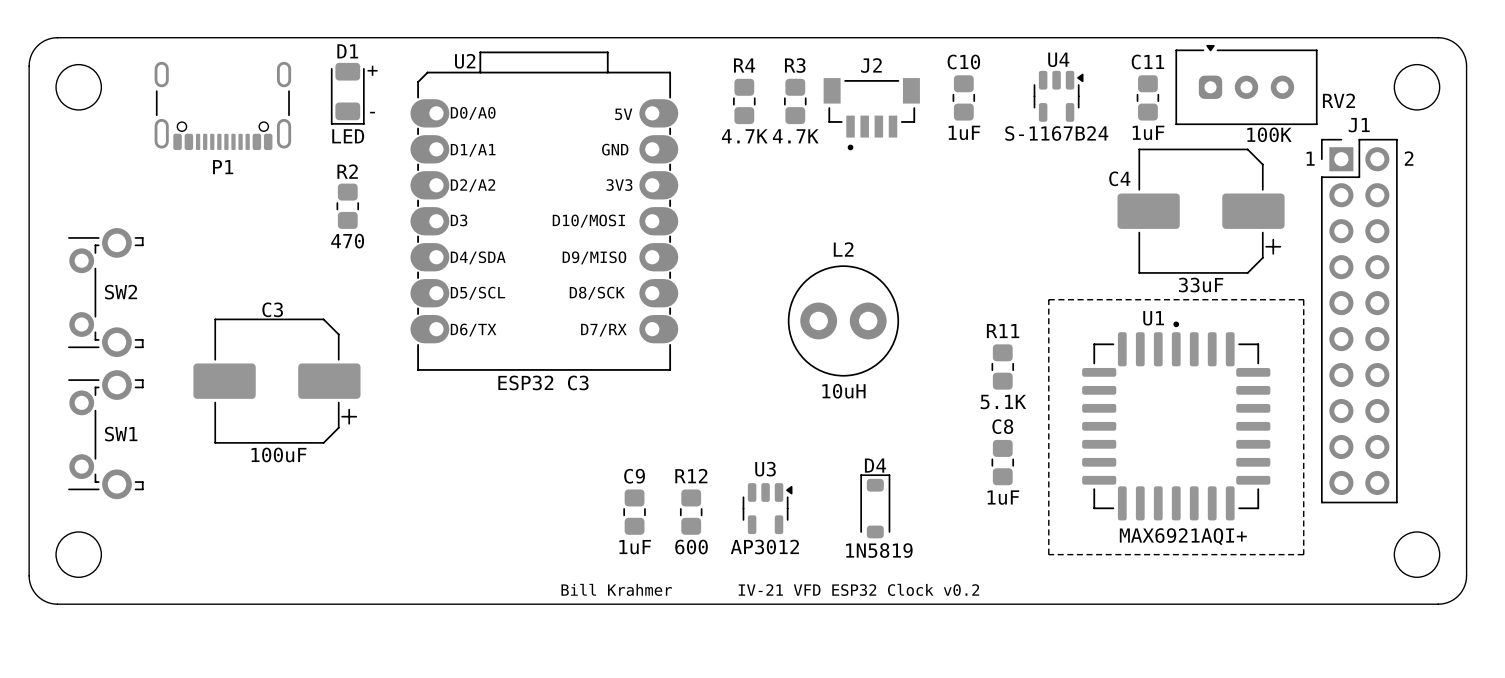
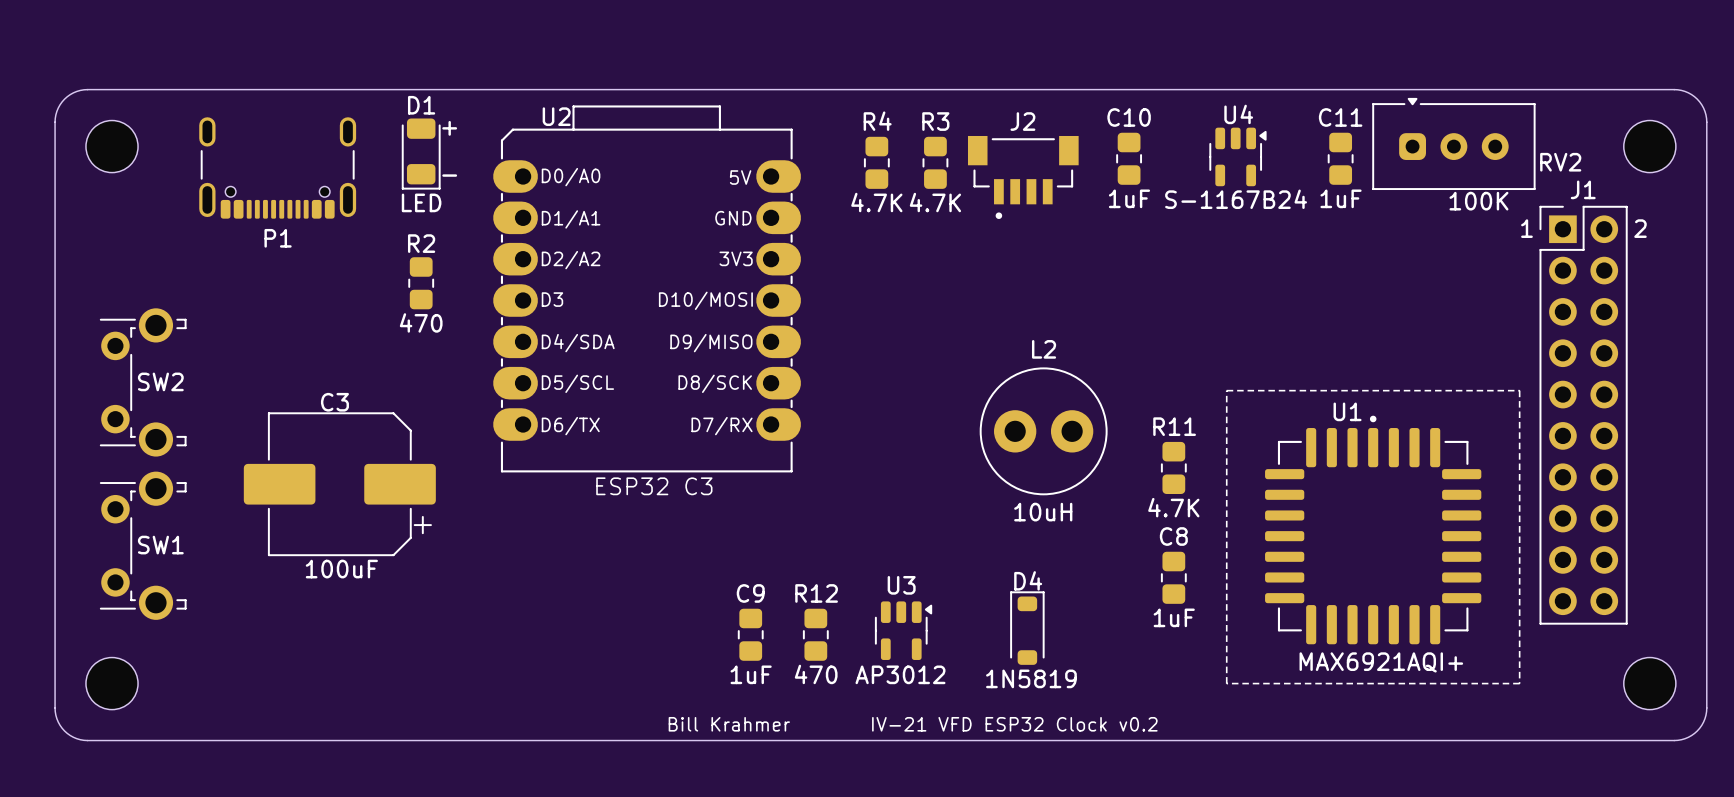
C4: 33uF (1201, 211) -> none
L2 position: (843, 320) -> (1043, 431)
R11 value: 5.1K (1003, 401) -> 4.7K (1173, 507)
R12 value: 600 (691, 547) -> 470 (816, 674)

